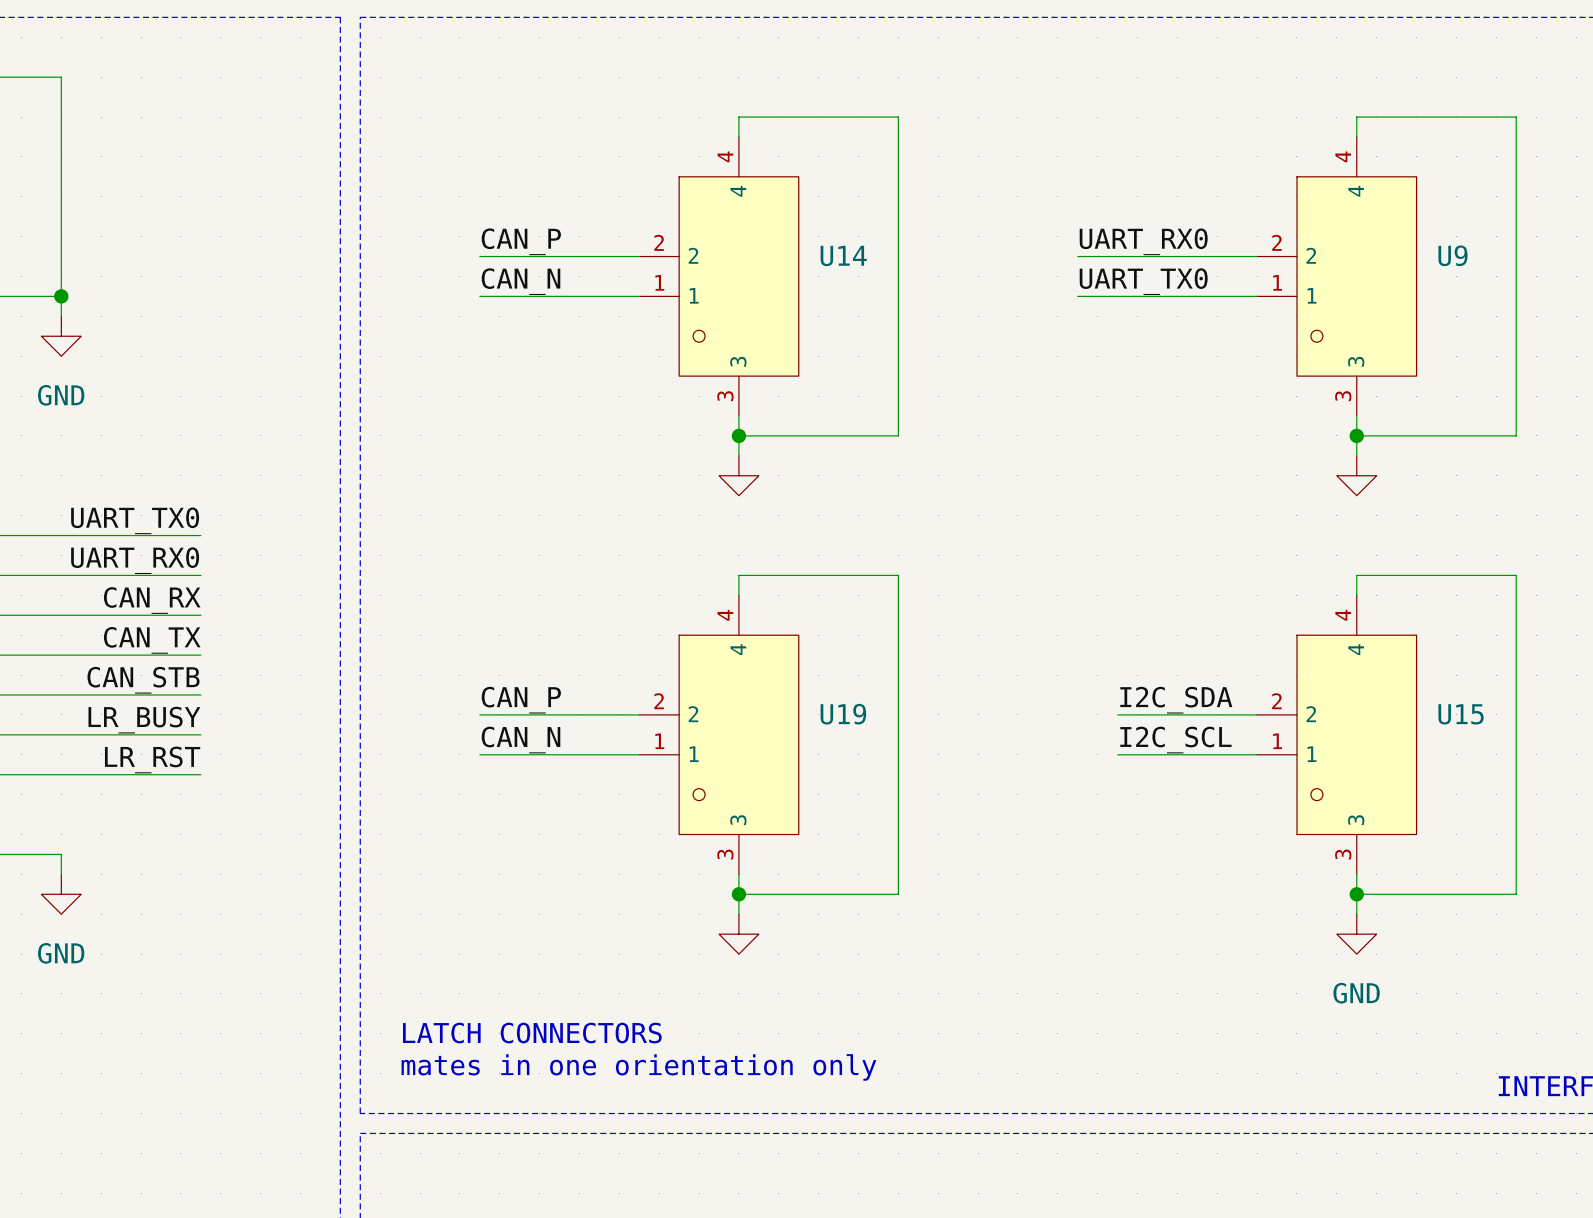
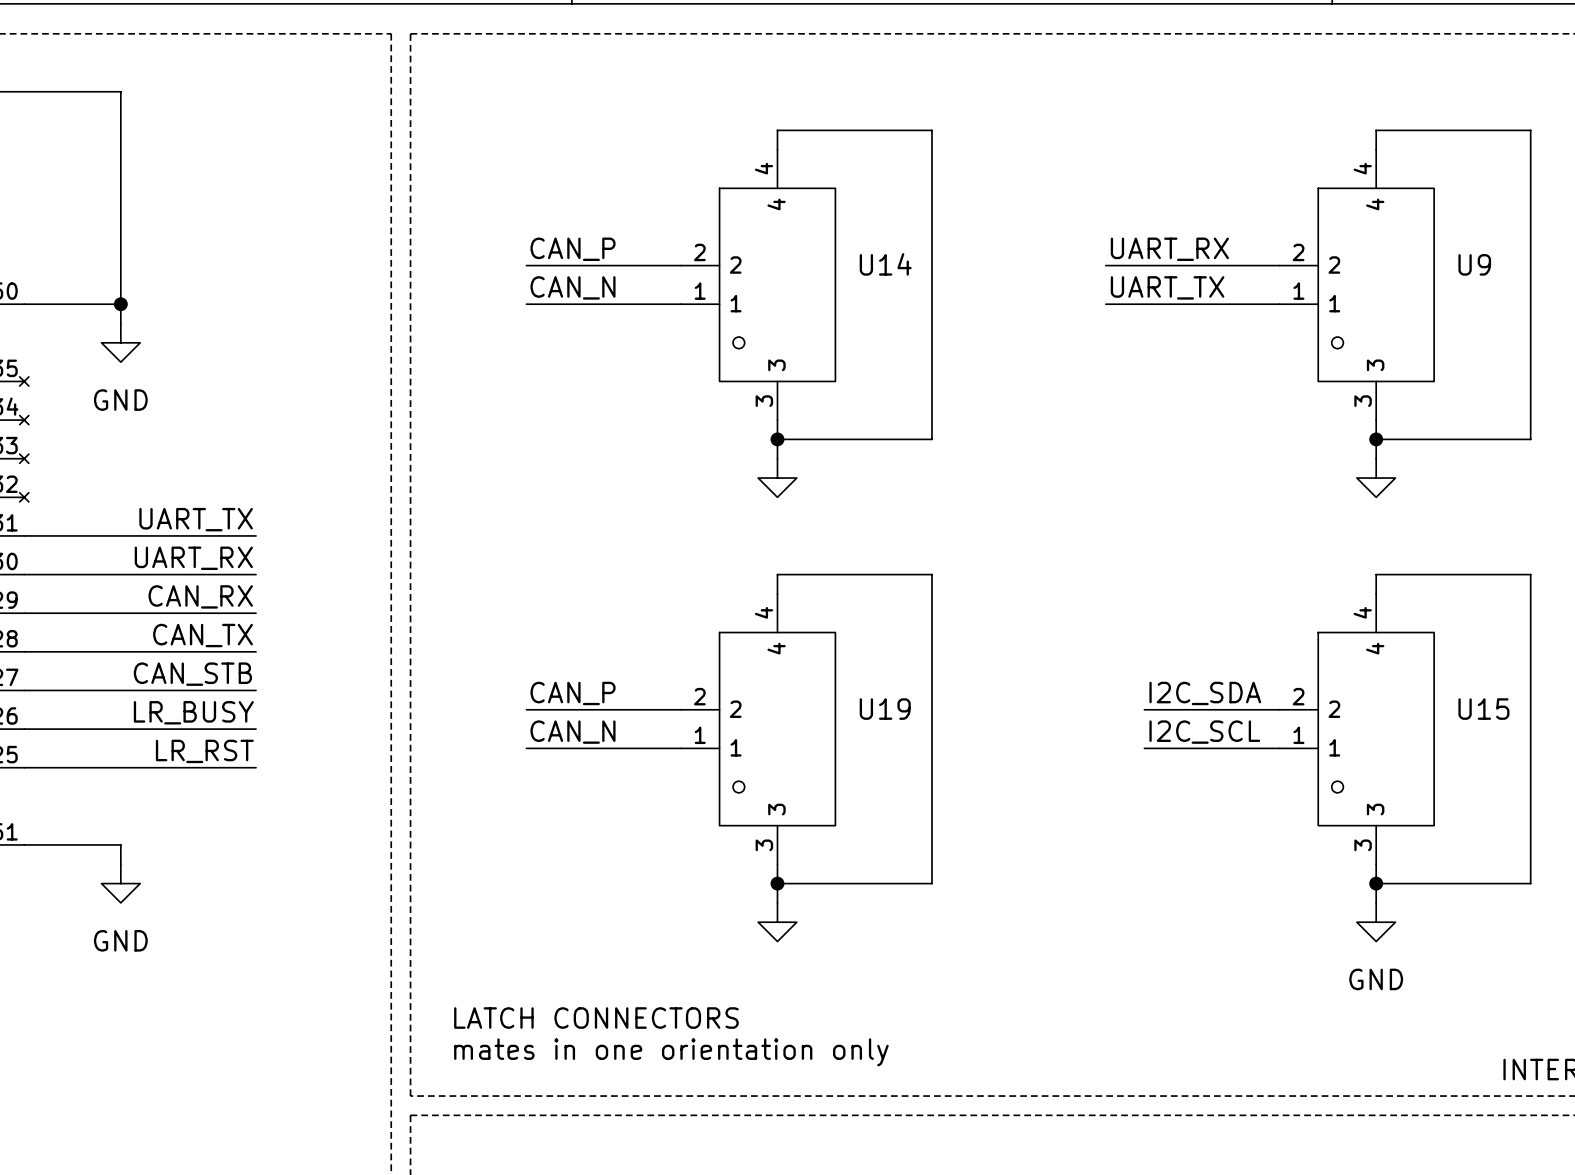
label: UART_RX0 (1143, 241) -> UART_RX (1169, 249)
label: UART_TX0 (1143, 281) -> UART_TX (1167, 287)
label: UART_TX0 (135, 520) -> UART_TX (196, 519)
label: UART_RX0 (135, 560) -> UART_RX (193, 558)

